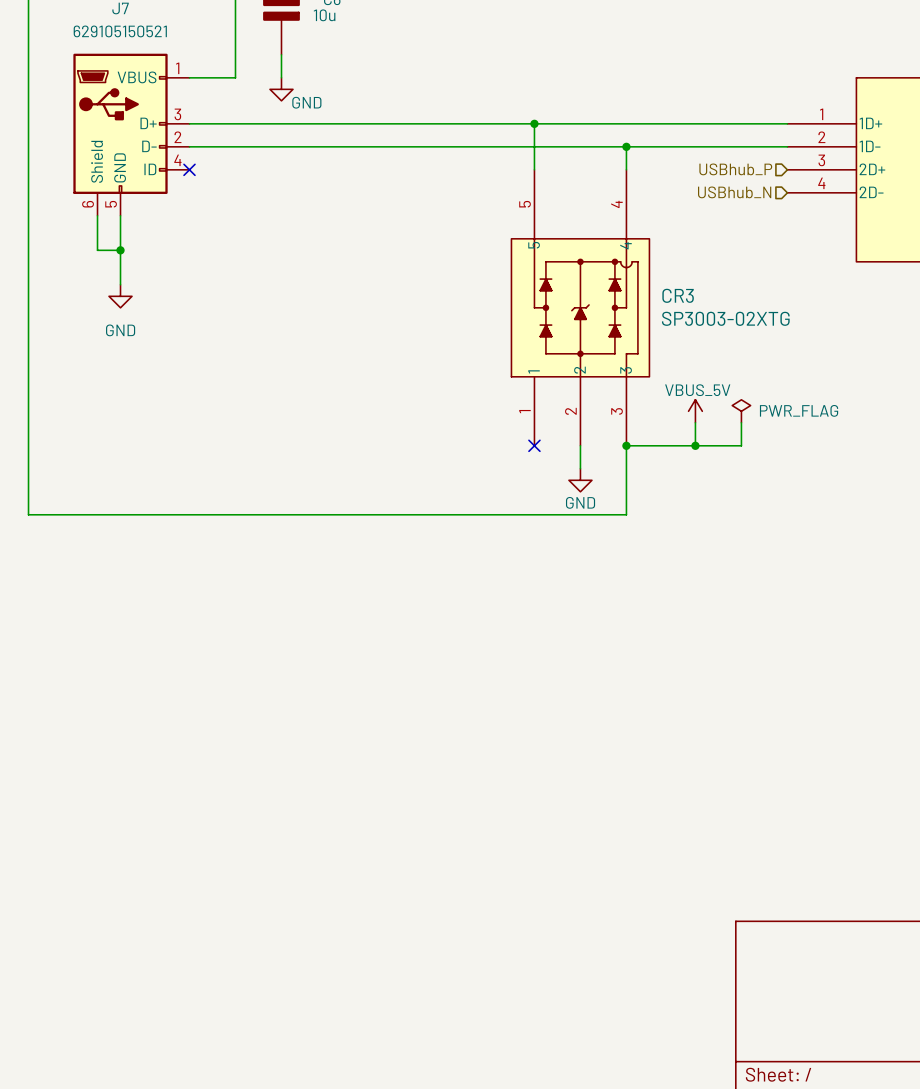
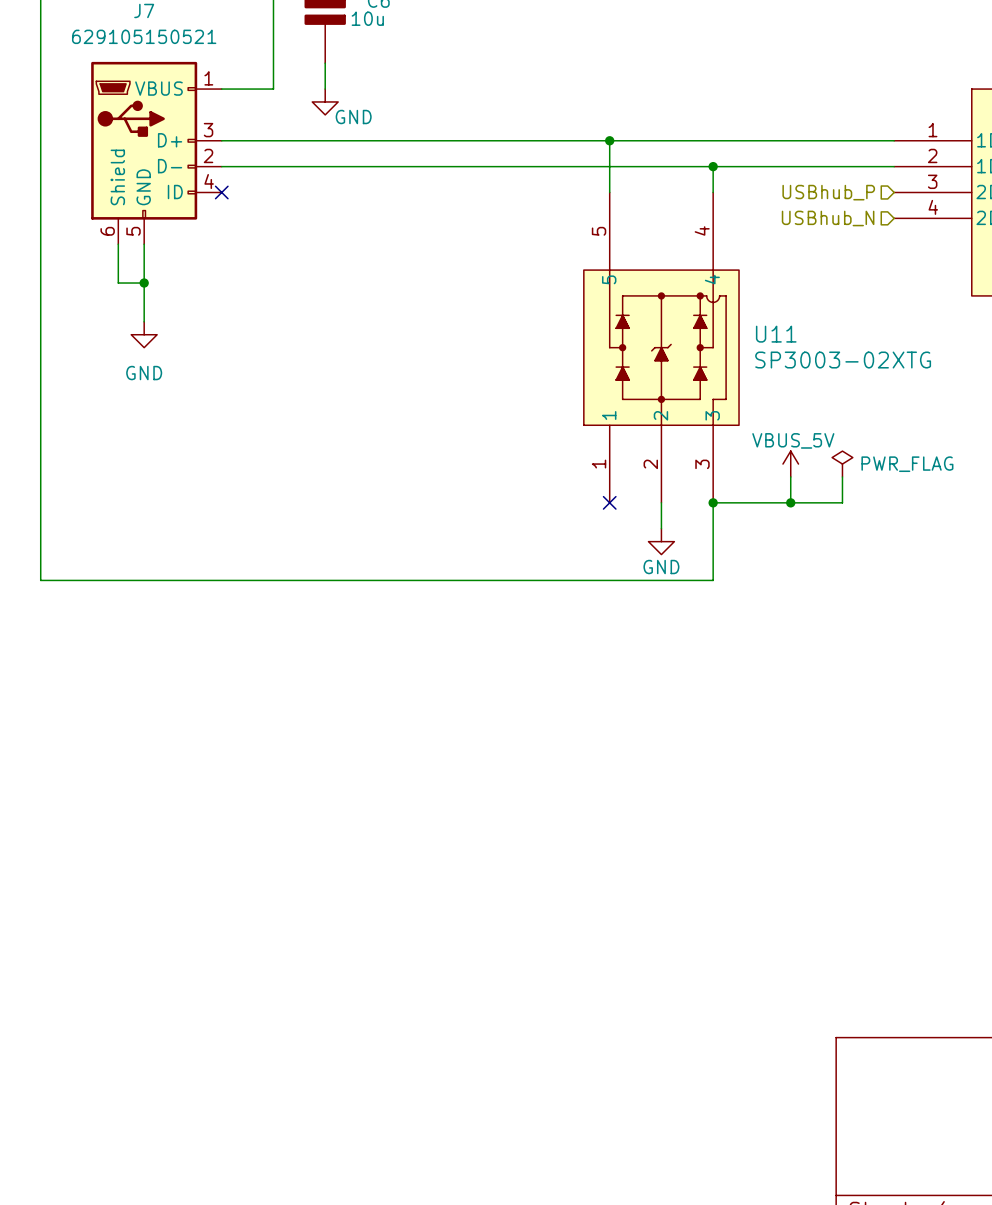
CR3 name: CR3 (678, 295) -> U11 (776, 334)

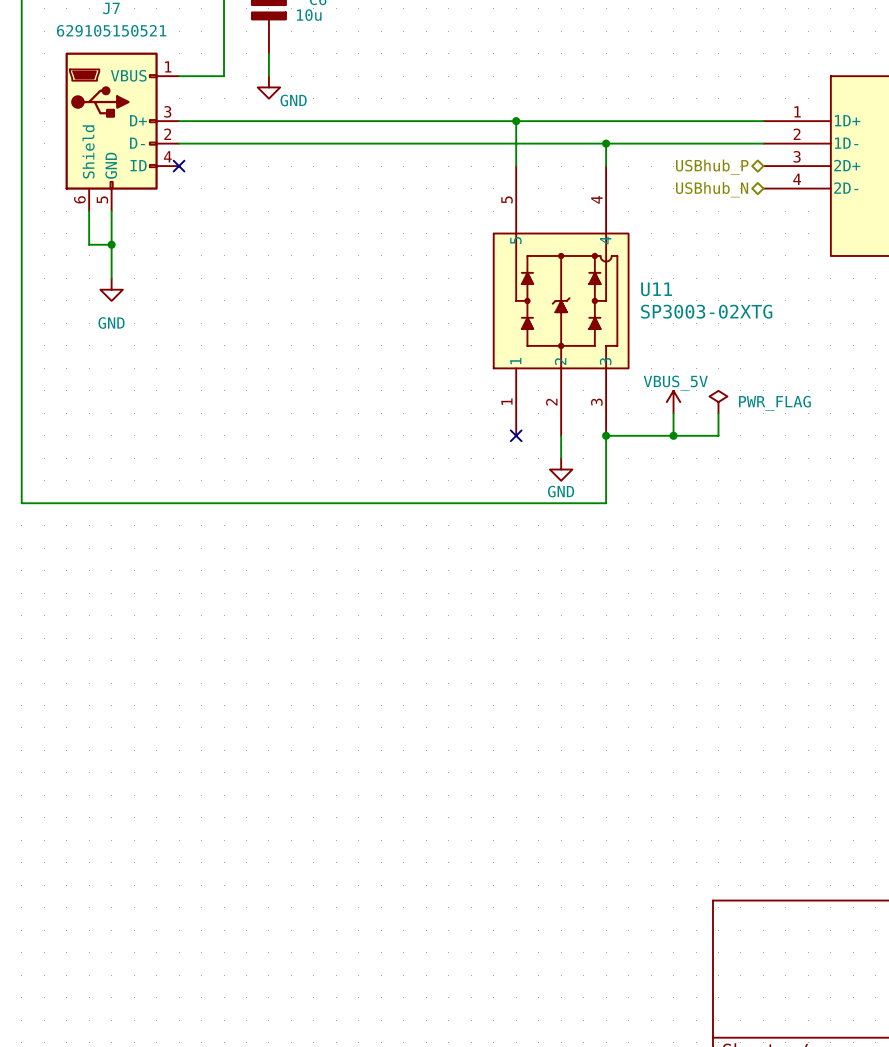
hierarchical label shape: input (828, 192) -> bidirectional (712, 167)
hierarchical label shape: input (828, 218) -> bidirectional (712, 189)

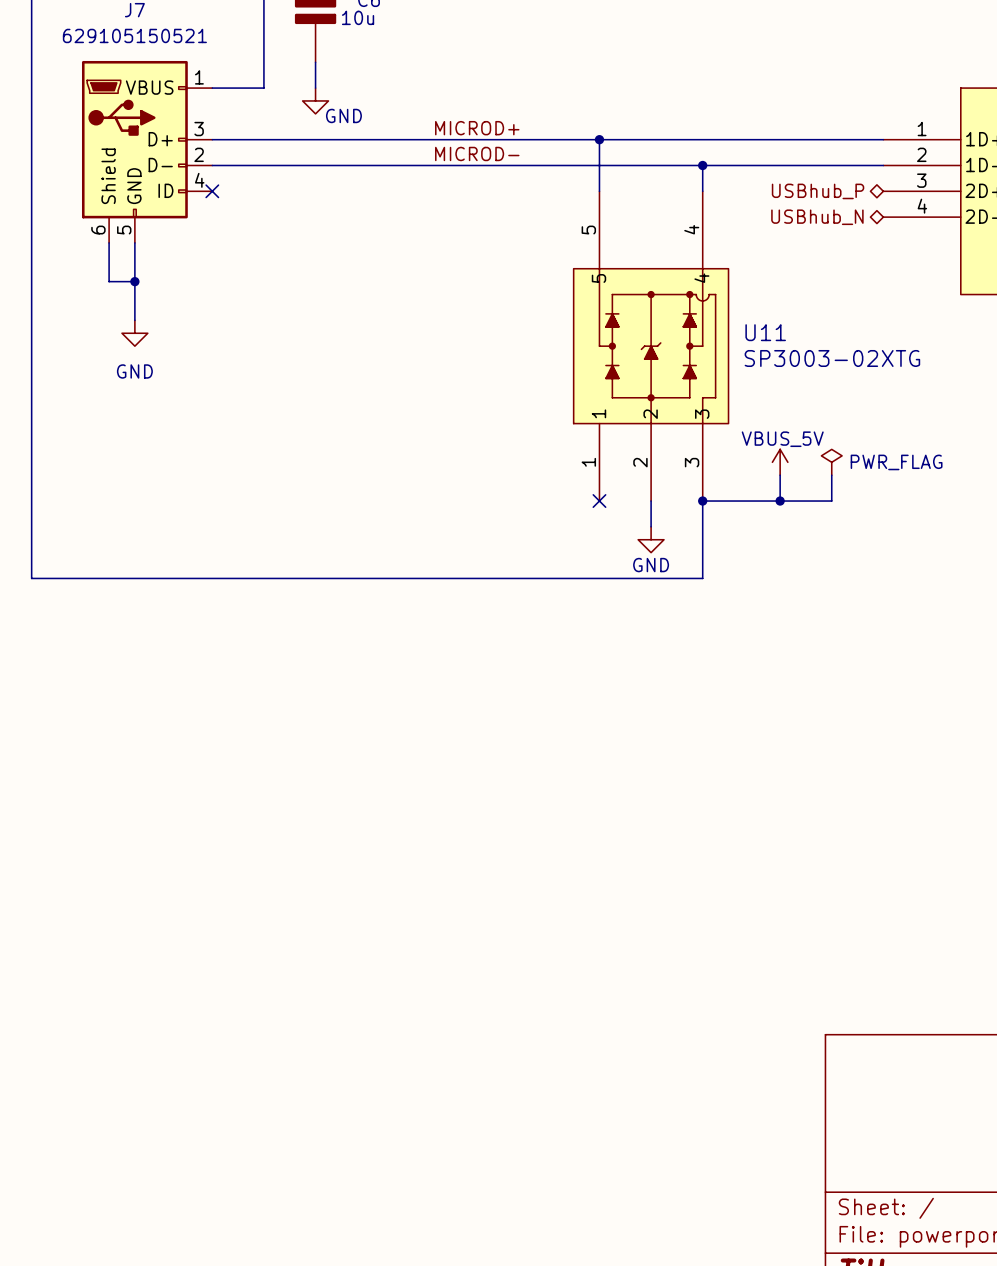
label: none -> MICROD+ (477, 128)
label: none -> MICROD- (477, 153)

